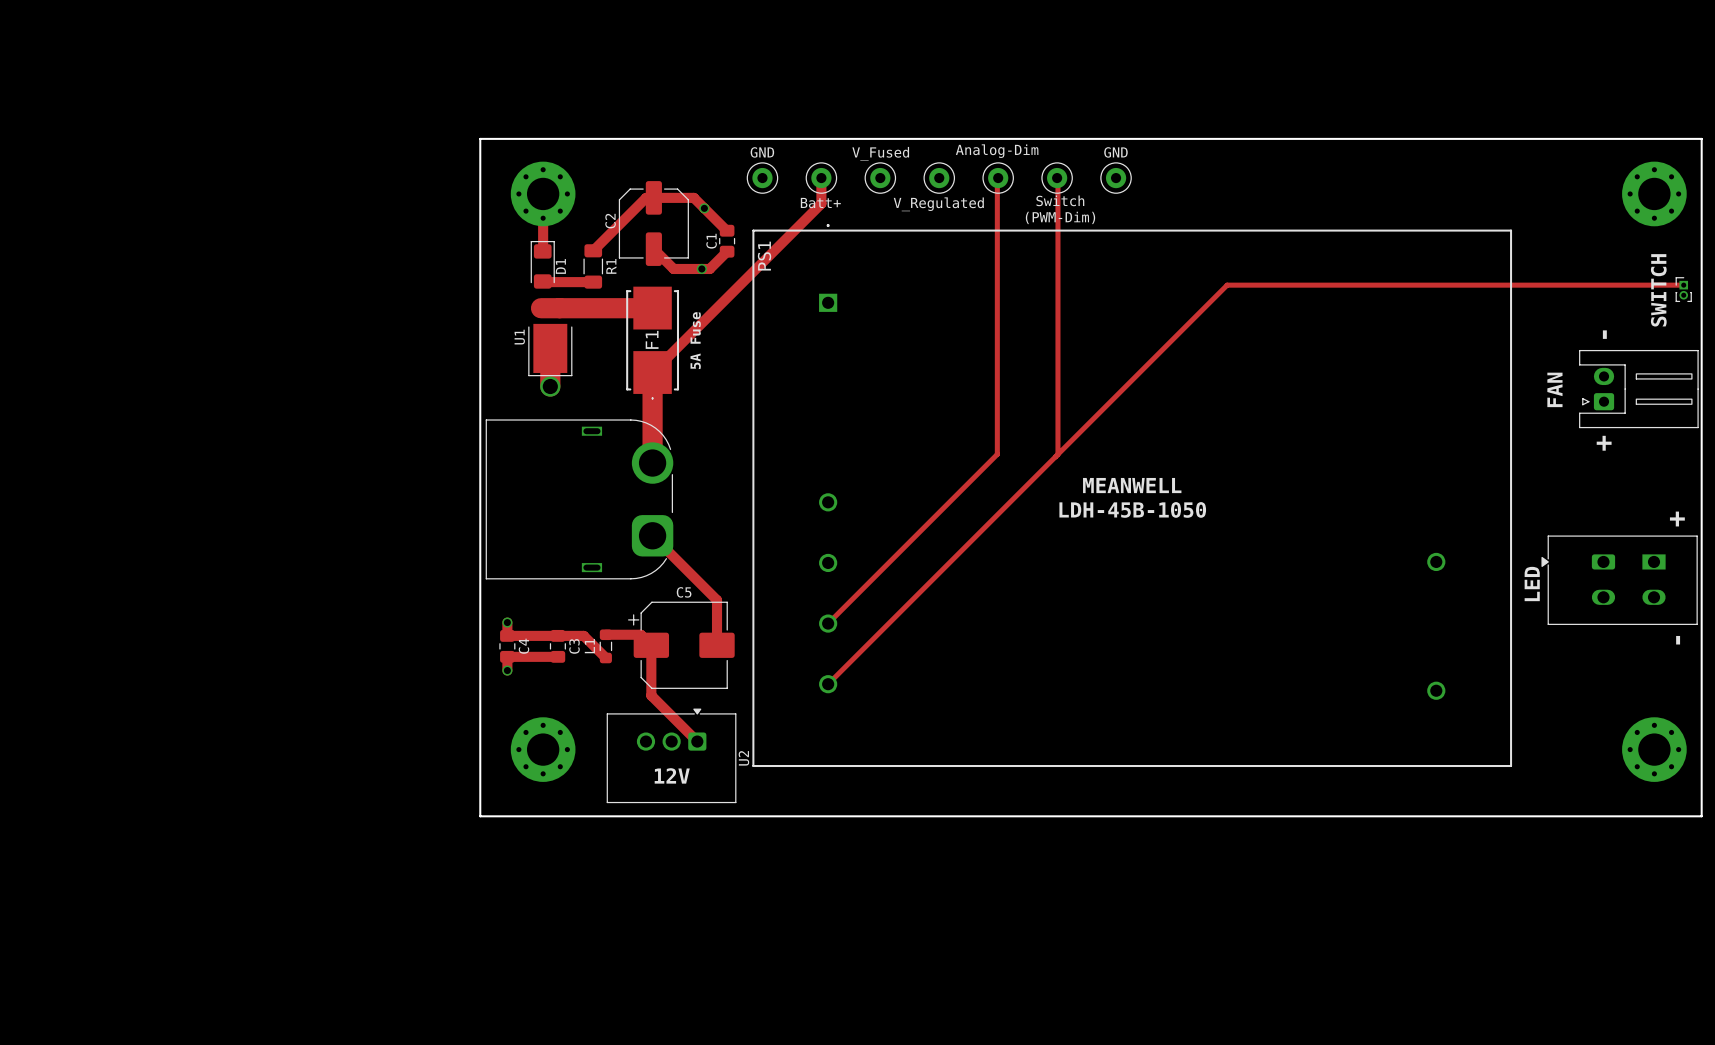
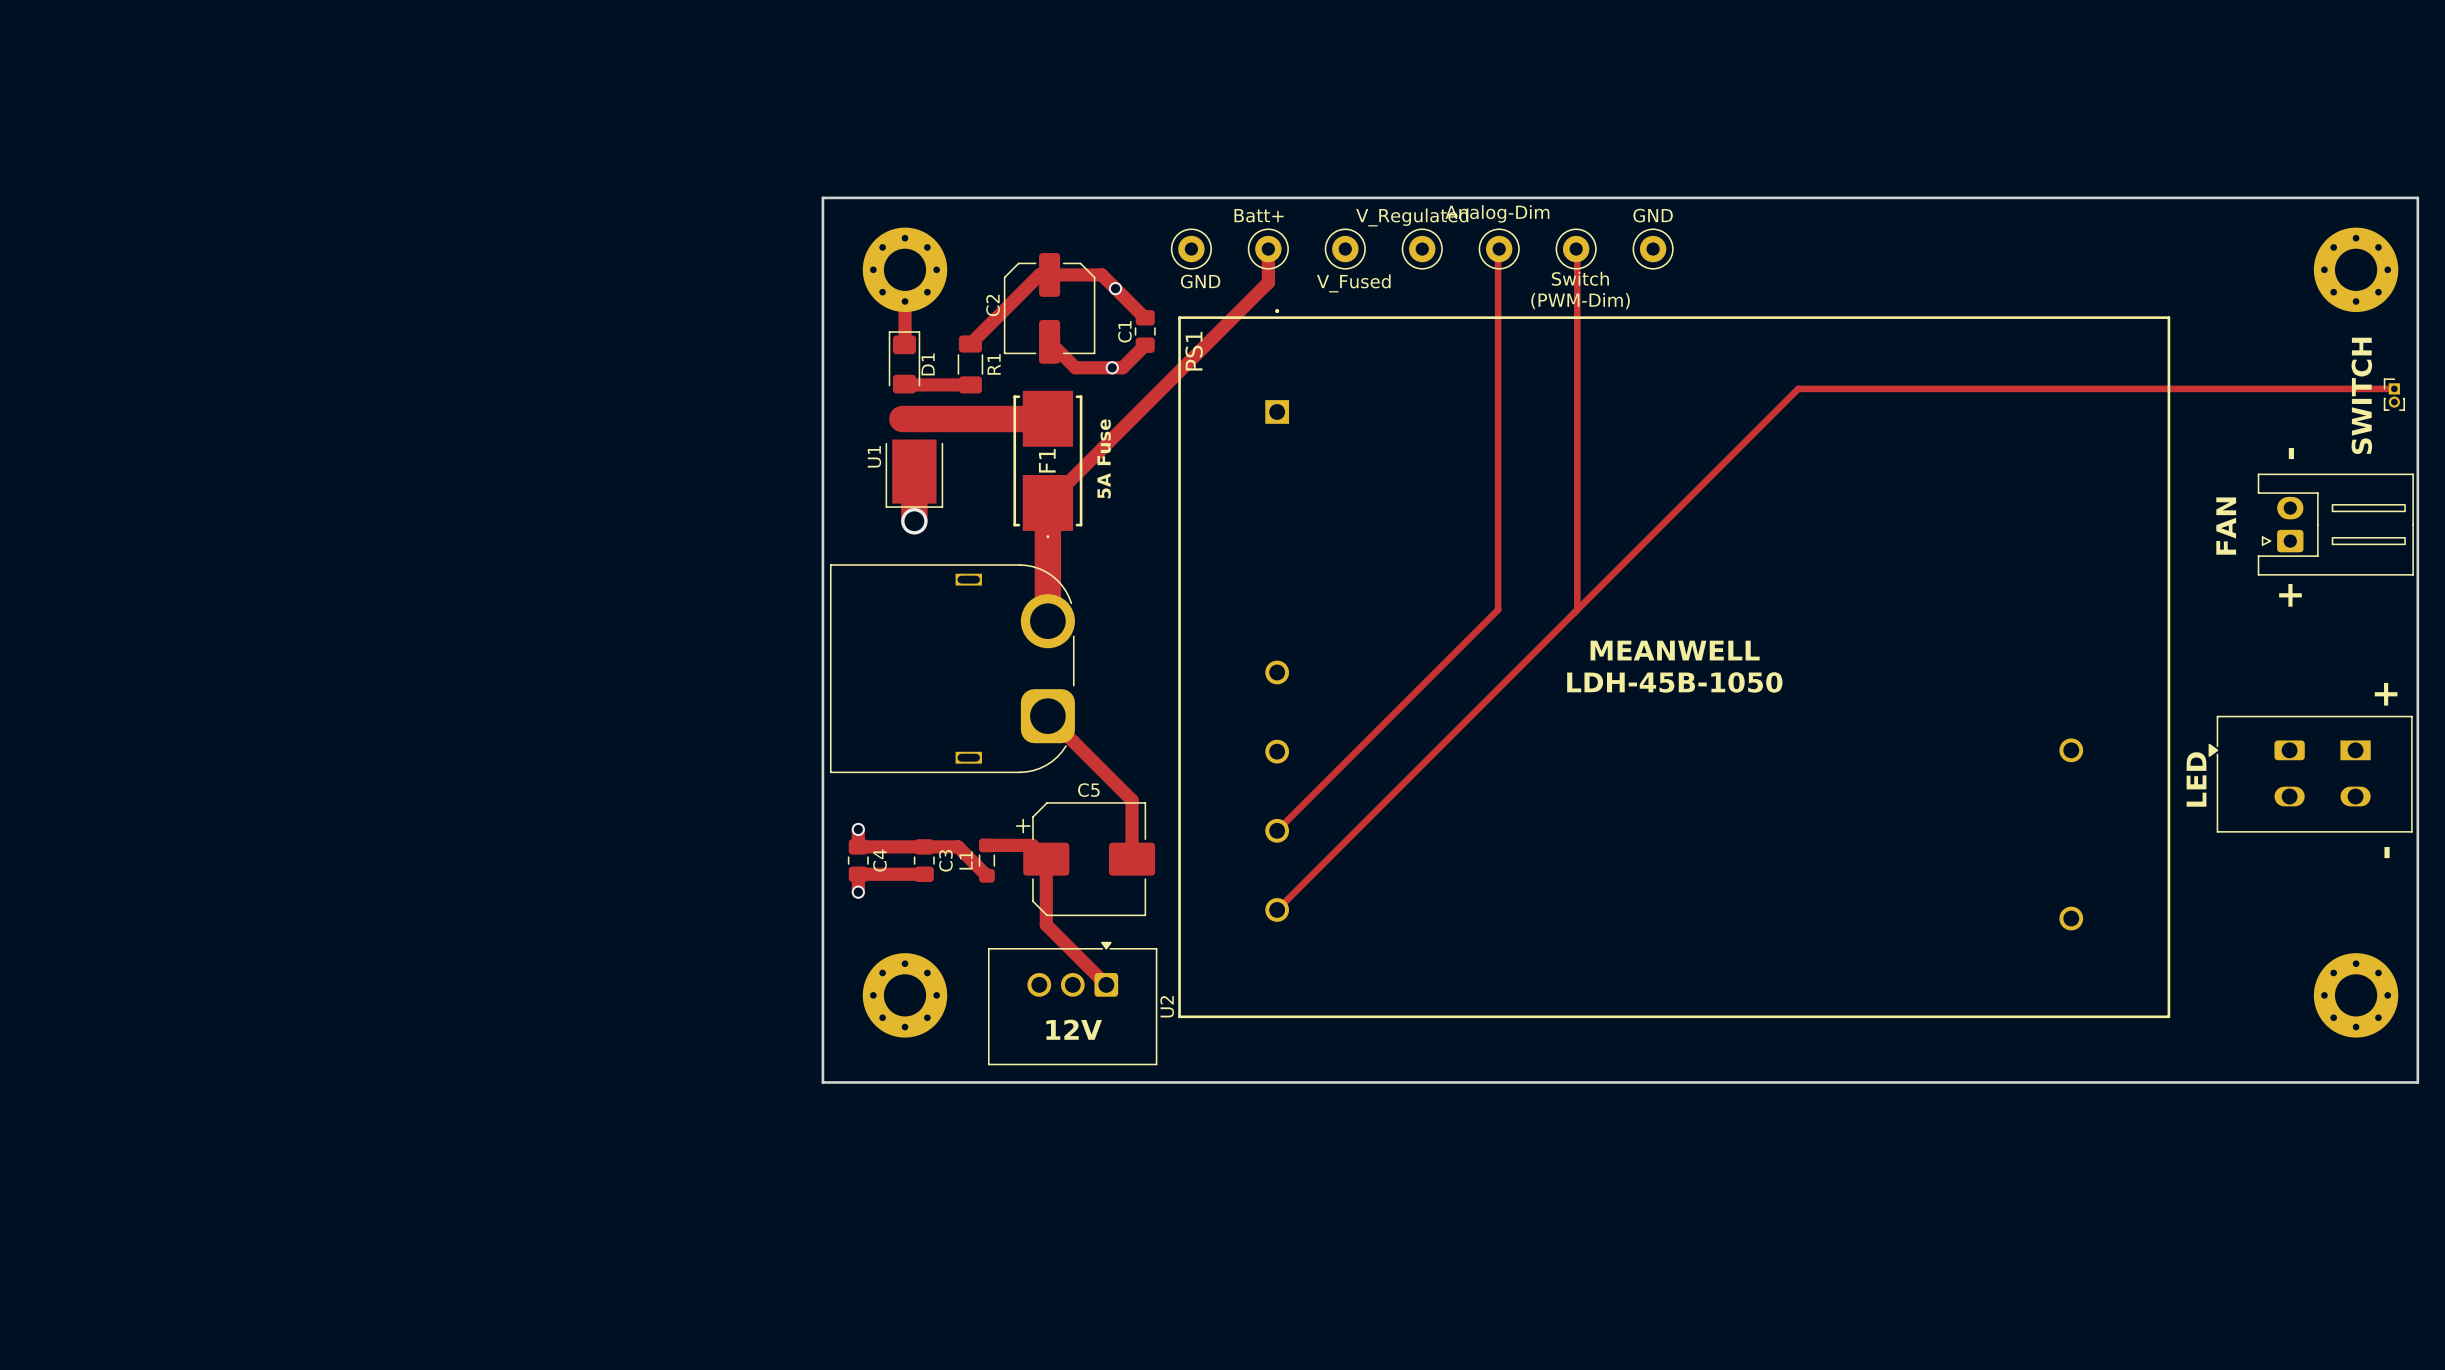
GND name position: GND (762, 152) -> GND (1200, 281)
V_Fused name position: V_Fused (880, 153) -> V_Fused (1353, 283)
Batt+ name position: Batt+ (820, 203) -> Batt+ (1259, 215)
V_Regulated name position: V_Regulated (938, 204) -> V_Regulated (1412, 217)

